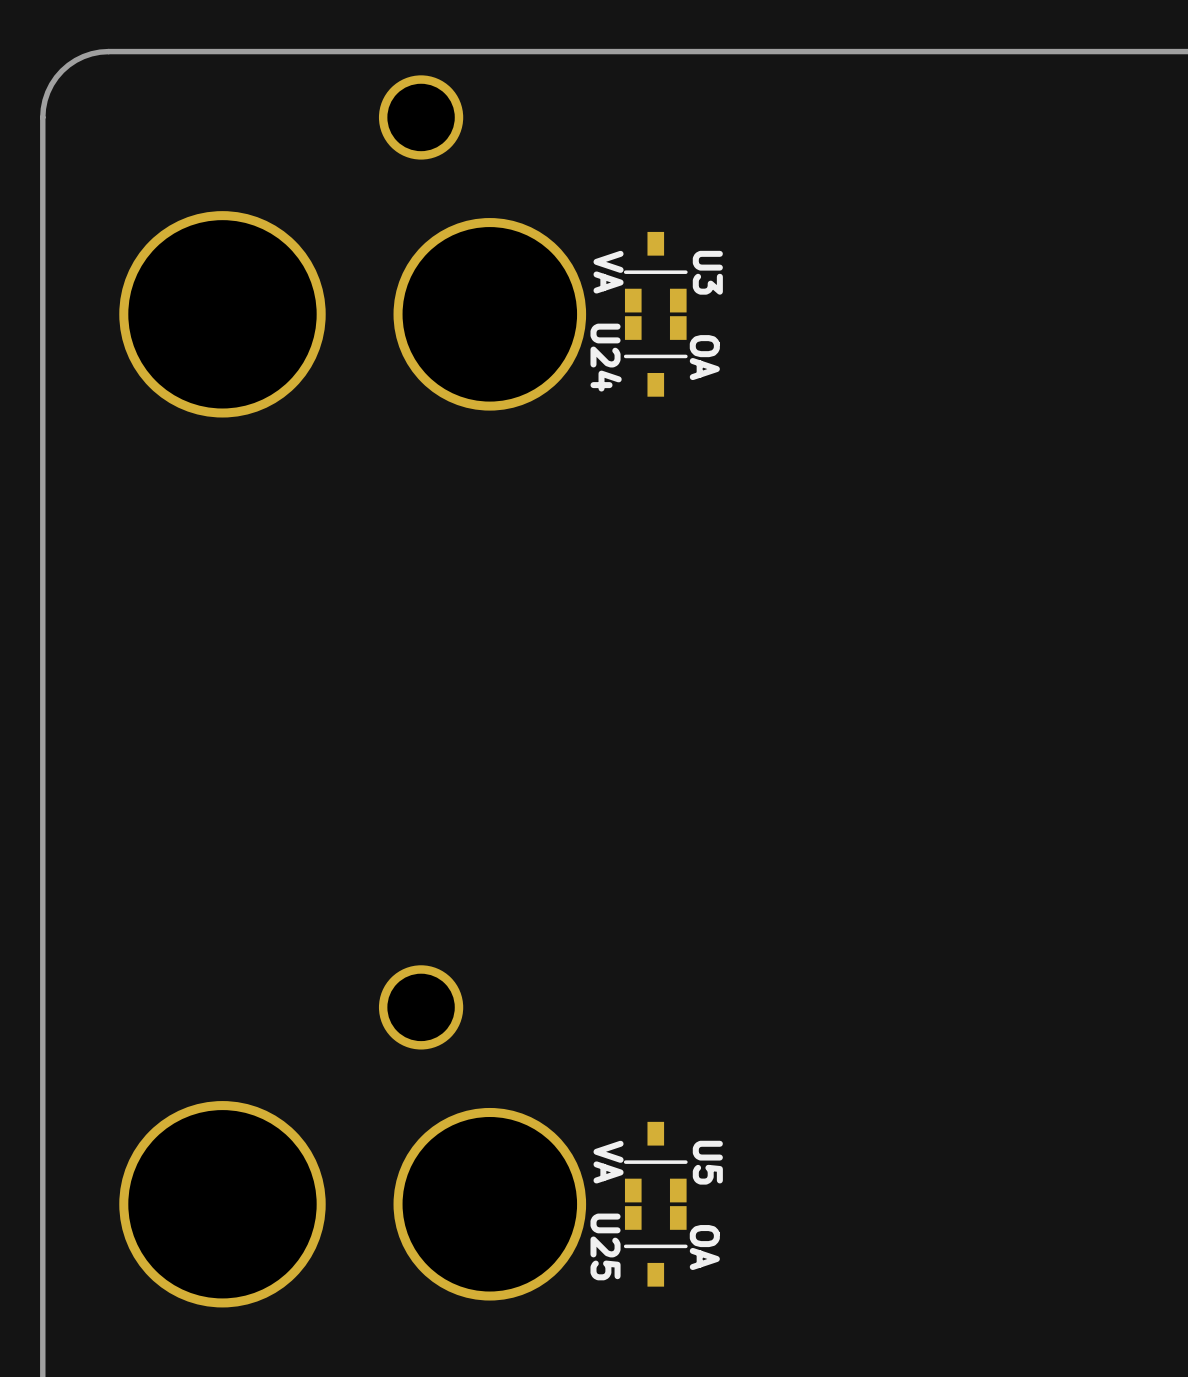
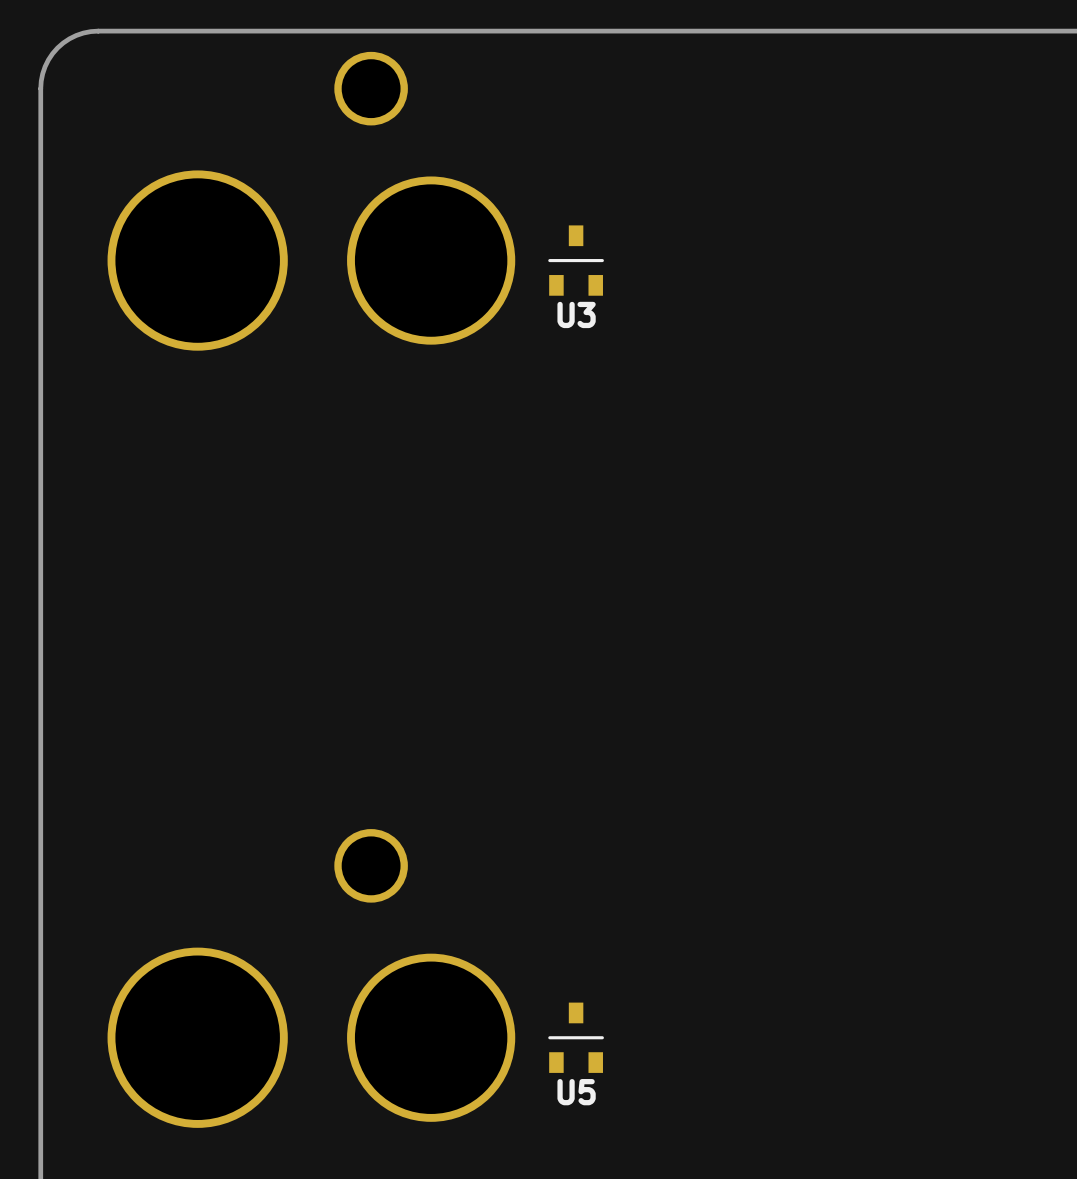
U3 value: VA (608, 272) -> none
U3 position: (655, 272) -> (576, 260)
U3 name rotation: 0° (707, 272) -> 90° counterclockwise (576, 314)
U3 name position: U3 (707, 272) -> U3 (576, 314)
U24: OA (655, 356) -> none
U5 value: VA (608, 1162) -> none
U5 position: (655, 1162) -> (576, 1037)
U5 name rotation: 0° (707, 1162) -> 90° counterclockwise (576, 1092)
U5 name position: U5 (707, 1162) -> U5 (576, 1092)
U25: OA (655, 1246) -> none

